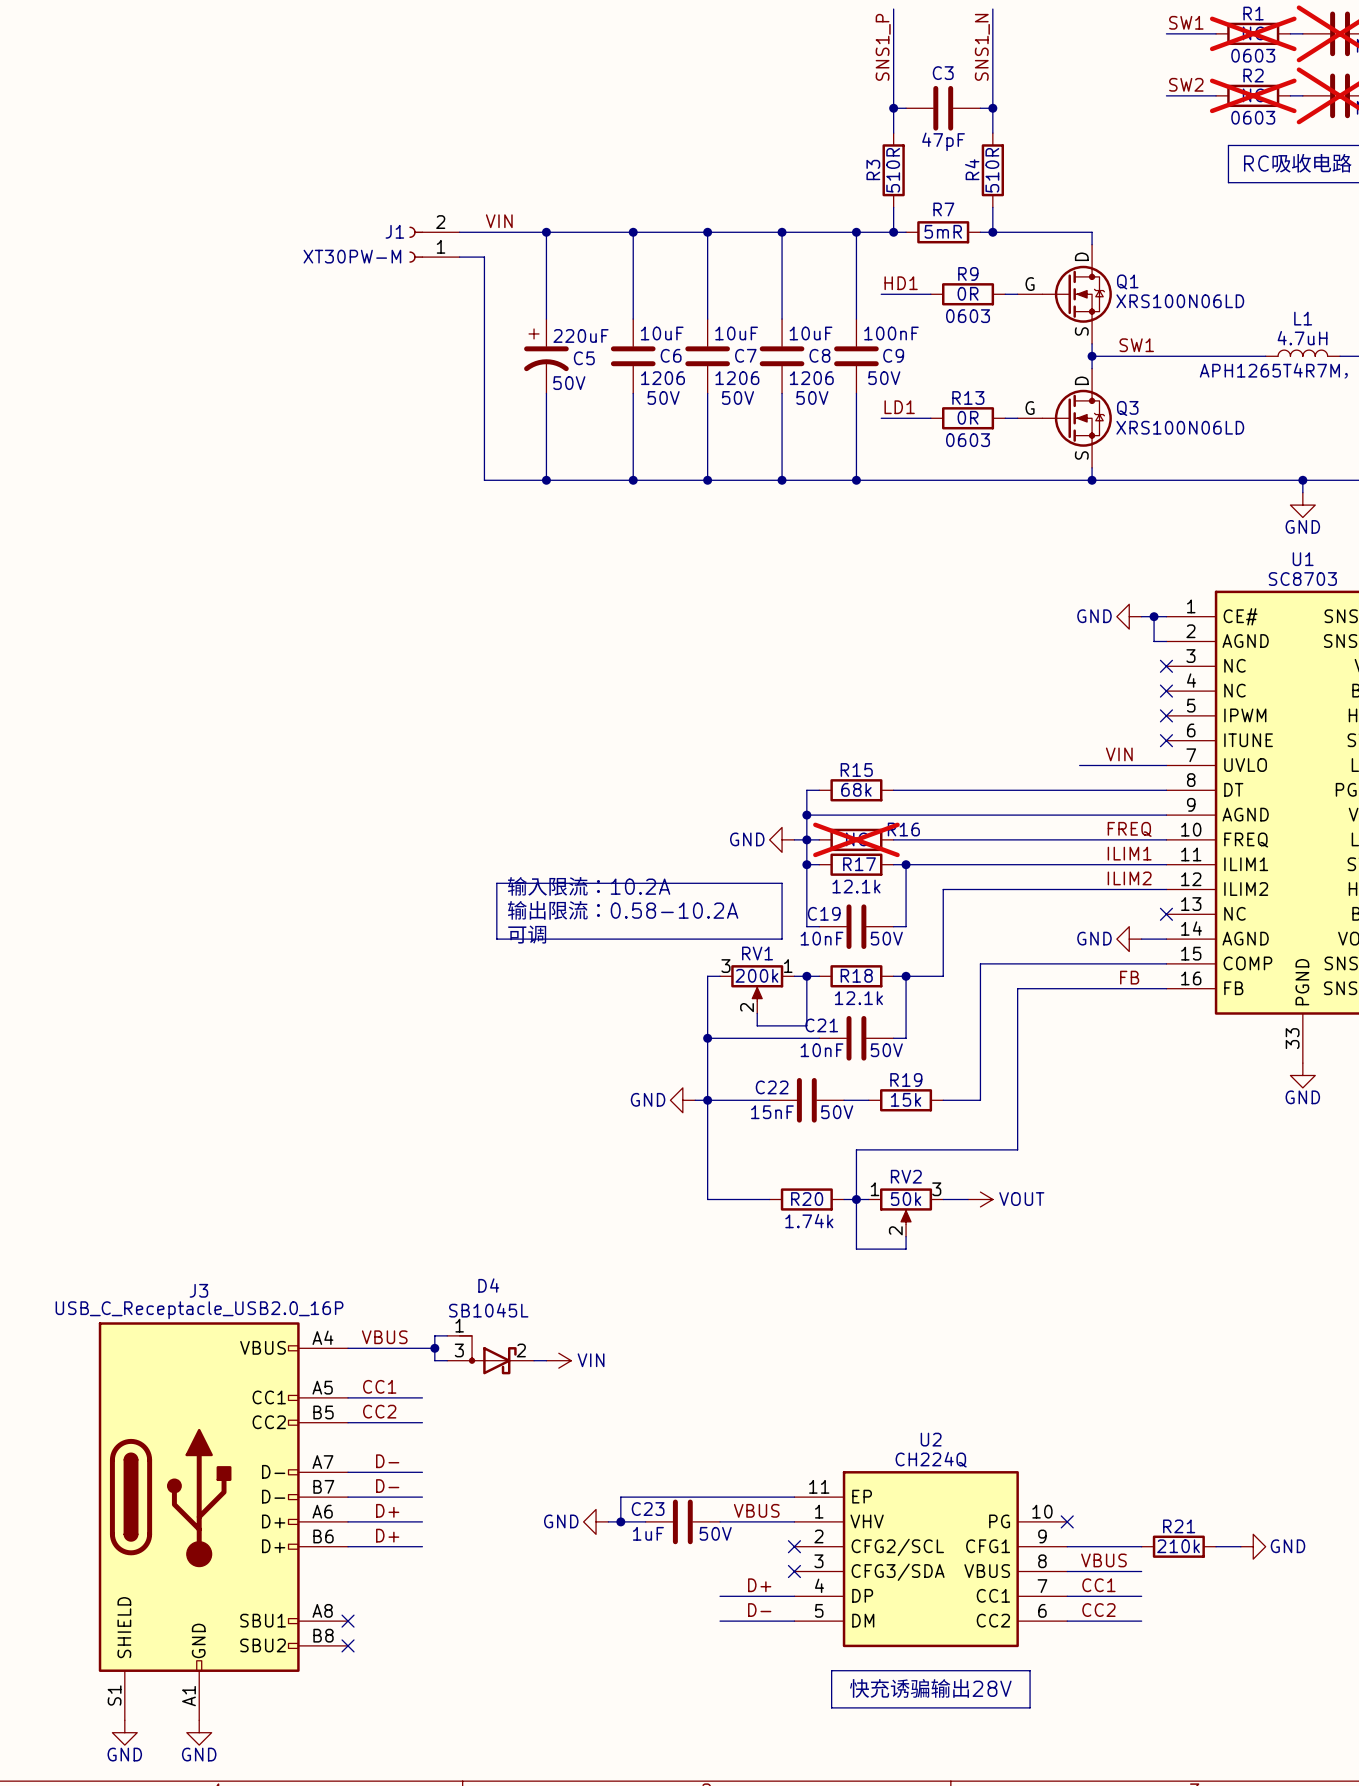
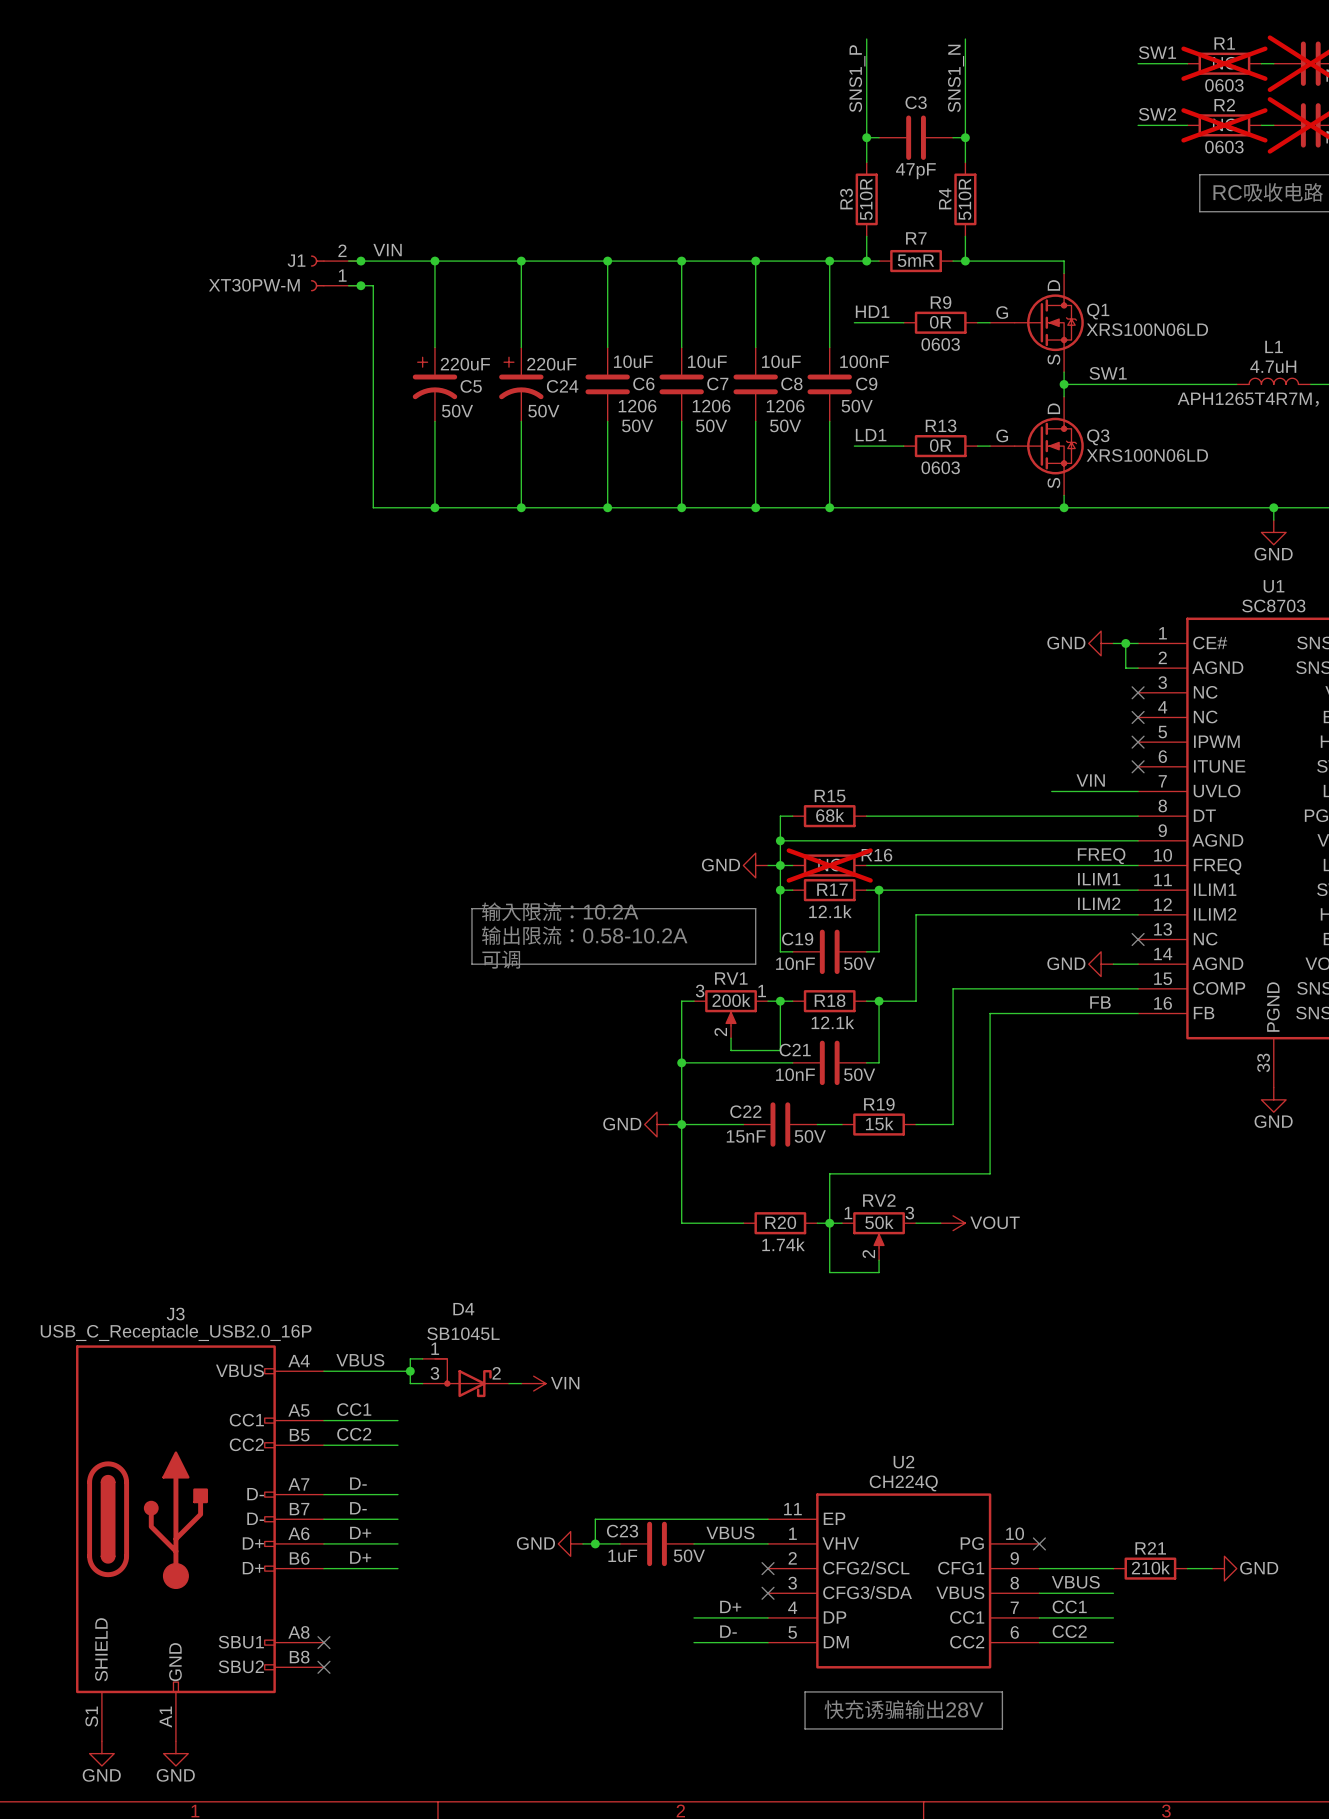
label position: VIN (499, 221) -> VIN (387, 250)
wire: none -> (348, 261) (434, 261) (434, 347)
junction: none -> (360, 261)
junction: none -> (434, 261)
J1 position: (434, 244) -> (335, 273)
junction: none -> (360, 285)
wire: (459, 257) (484, 257) (484, 480) -> (348, 285) (373, 285) (373, 507) (459, 507)
C5: none -> 220uF (434, 384)
C5 name: C5 (584, 358) -> C24 (562, 386)
wire: none -> (434, 421) (434, 507)
junction: none -> (434, 507)

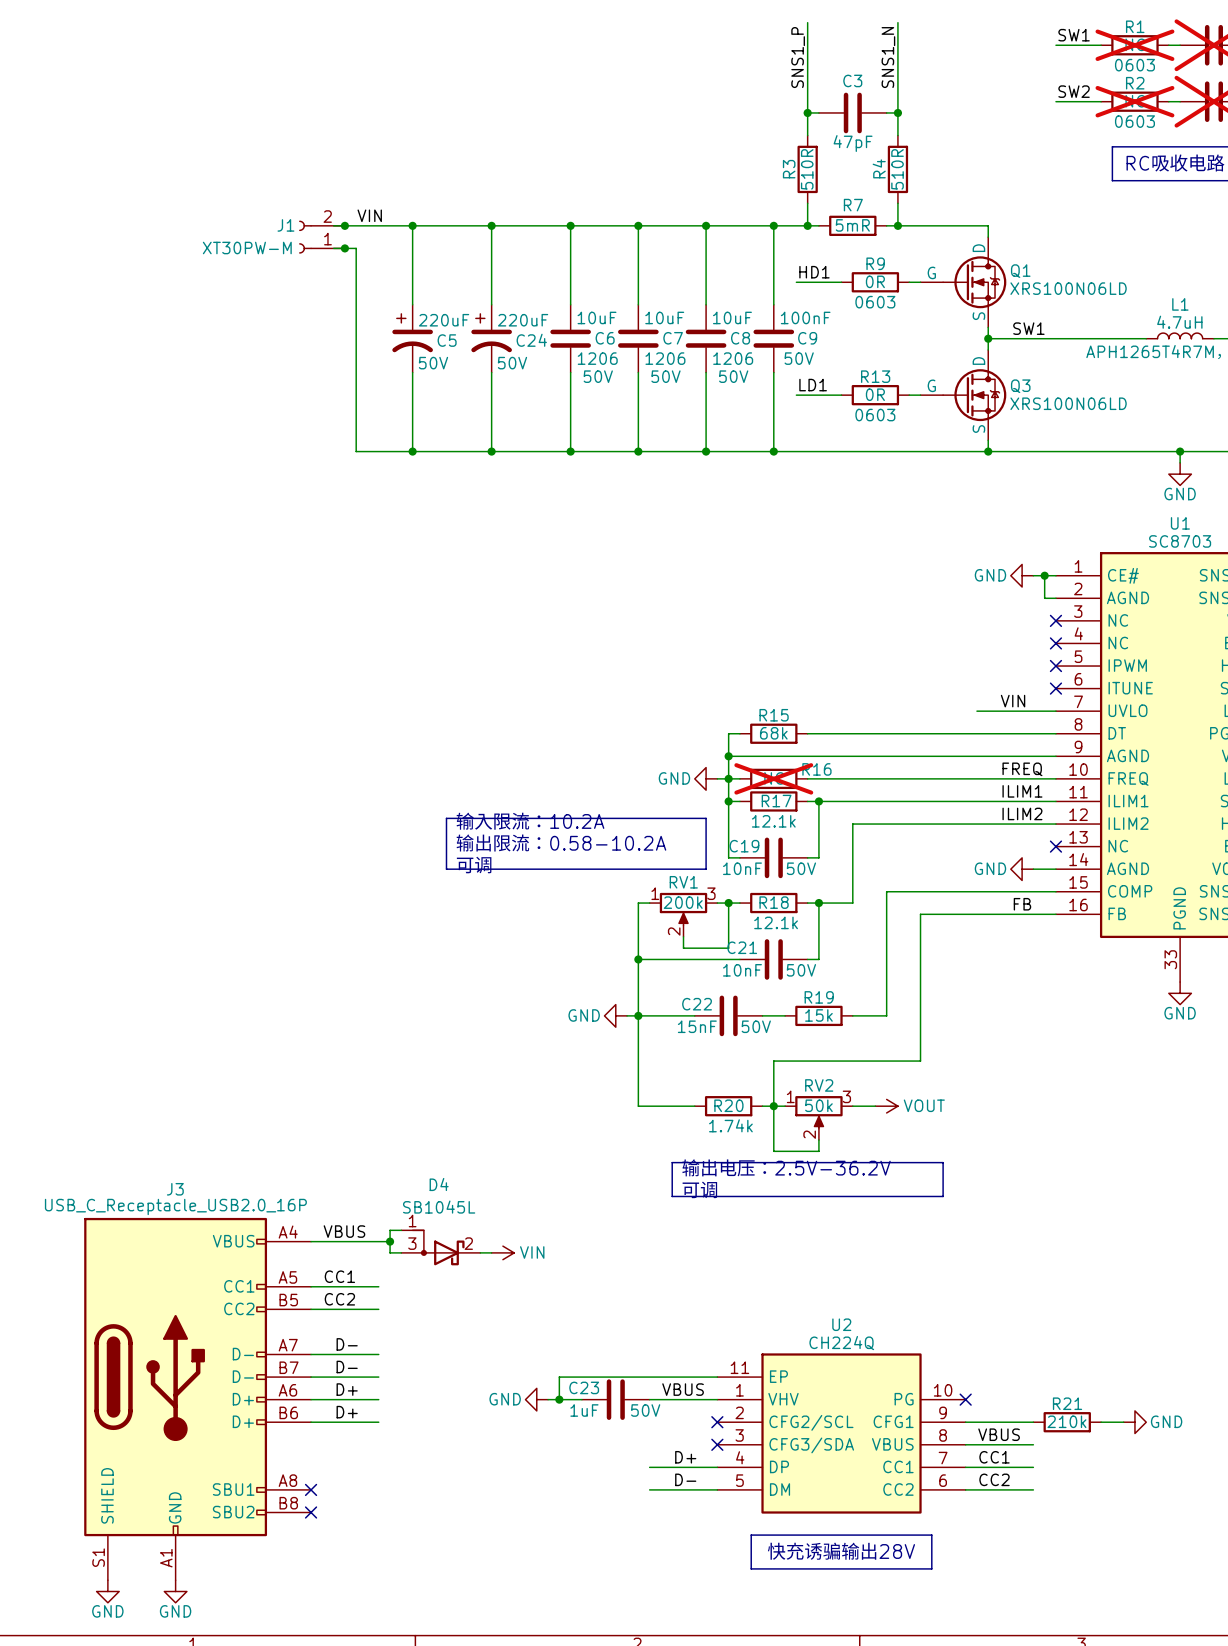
RV1 flip: as is (731, 1007) -> left-right (683, 909)
line: none -> (672, 1162) (943, 1162) (943, 1196) (672, 1196) (672, 1162)
text: none -> 输出电压：2.5V-36.2V (786, 1167)
text: none -> 可调 (699, 1189)

